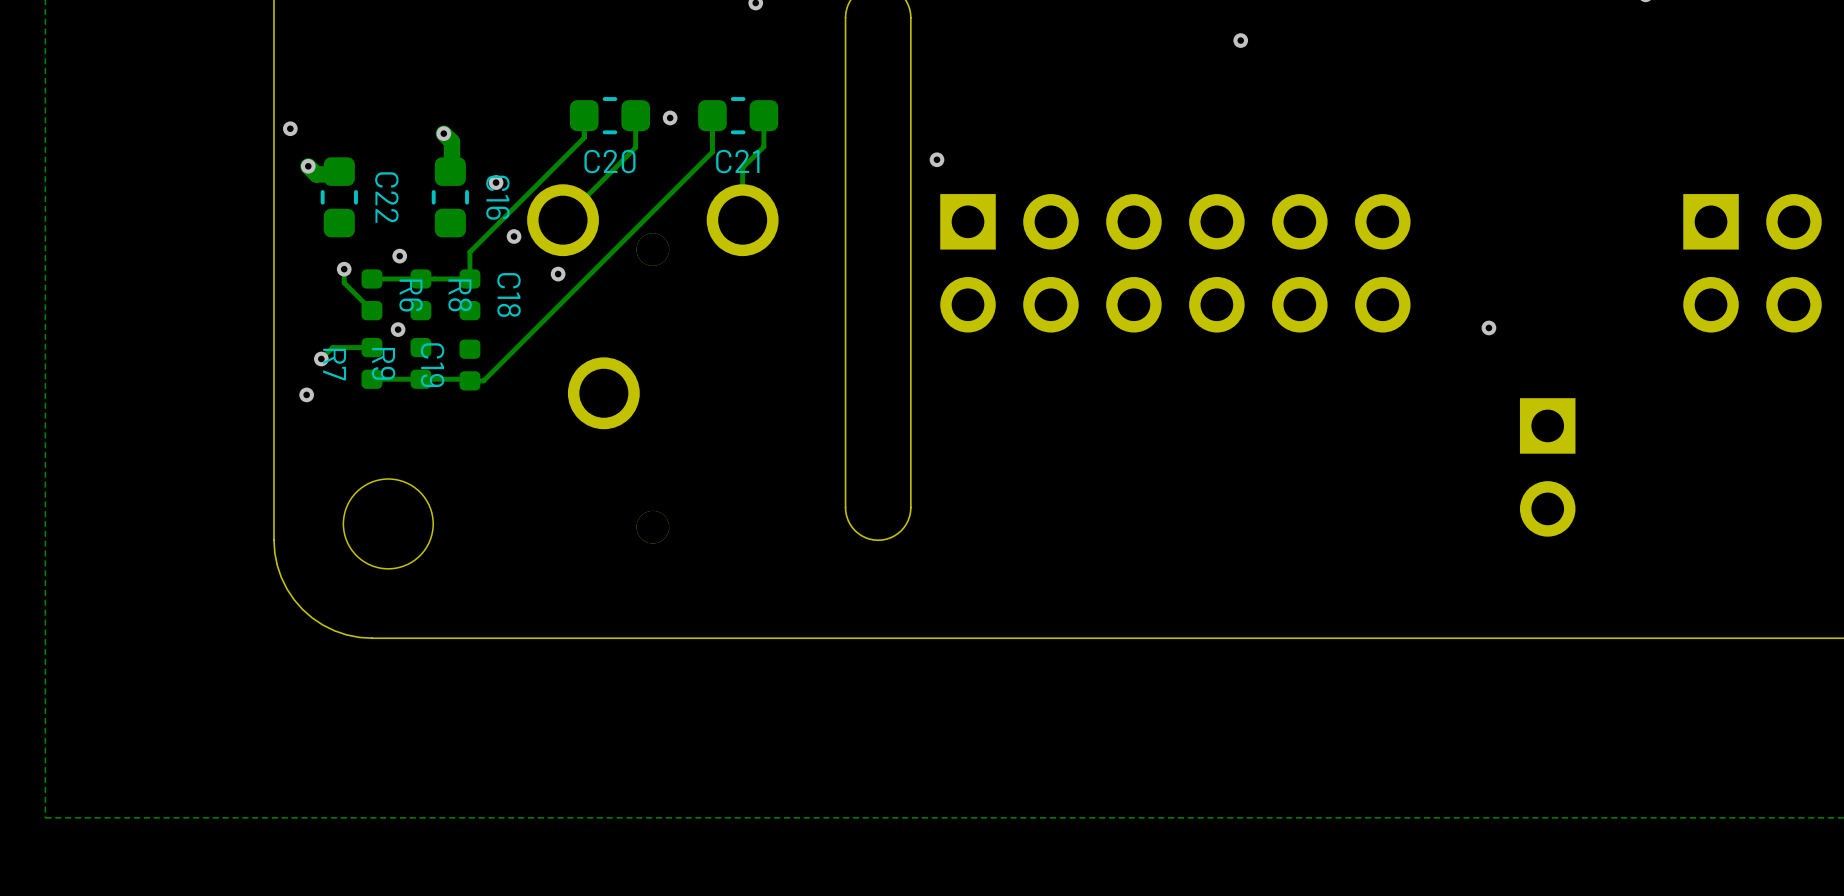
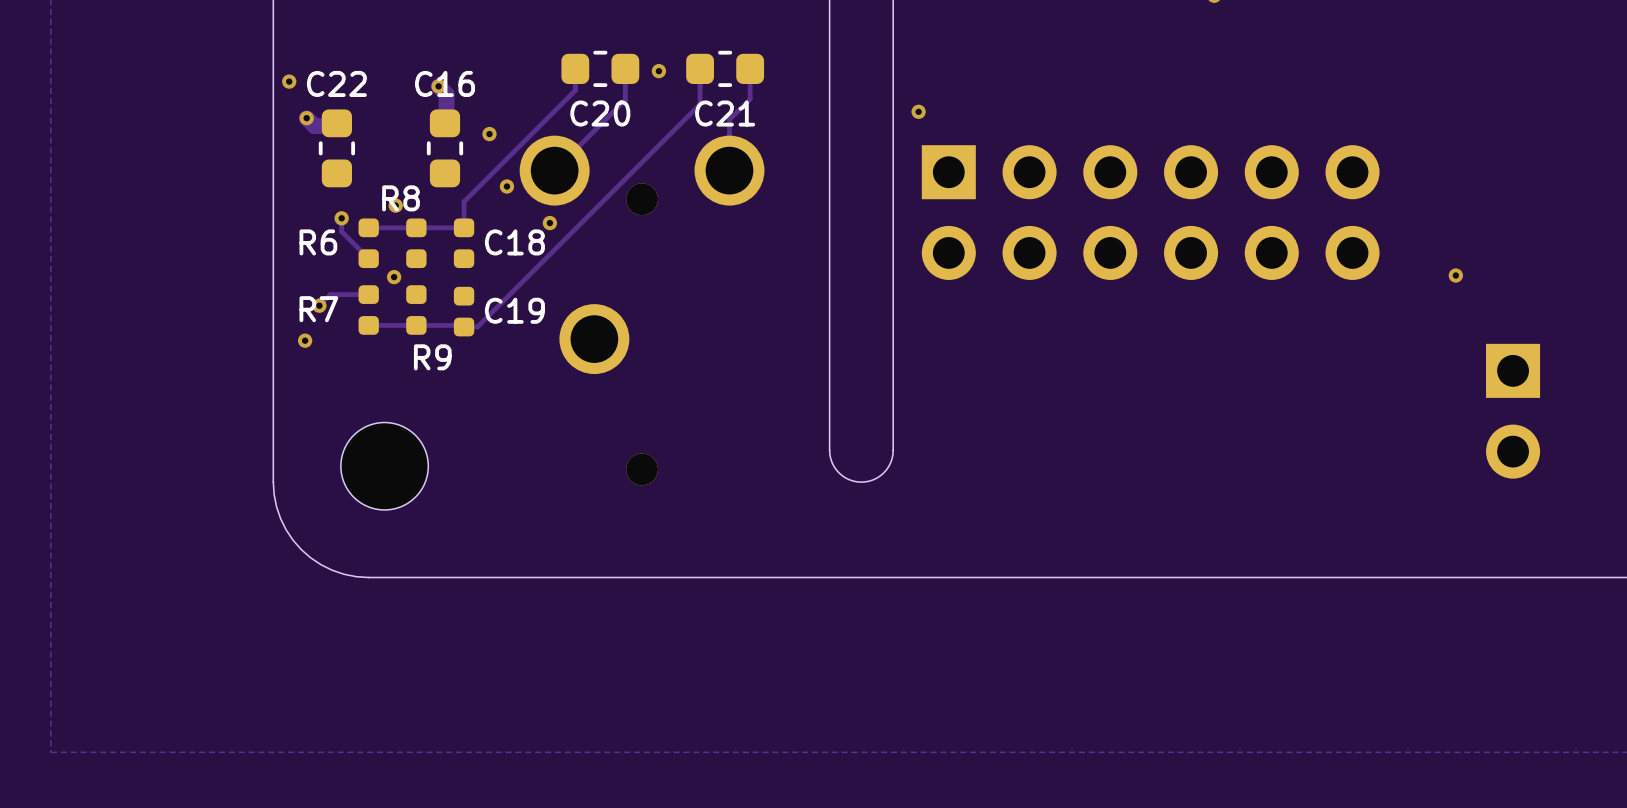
C22 name rotation: 0° (386, 197) -> 90° counterclockwise (336, 83)
C16 name rotation: 0° (497, 197) -> 90° counterclockwise (444, 83)
C18 name rotation: 0° (509, 294) -> 90° counterclockwise (514, 242)
R6 name rotation: 0° (411, 295) -> 90° counterclockwise (318, 242)
R6 name position: R6 (411, 295) -> R6 (318, 242)
R8 name rotation: 0° (460, 295) -> 90° counterclockwise (401, 198)
R8 name position: R8 (460, 295) -> R8 (401, 198)
R9 name rotation: 0° (383, 363) -> 90° counterclockwise (432, 357)
R9 name position: R9 (383, 363) -> R9 (432, 357)
R7 name rotation: 0° (334, 364) -> 90° counterclockwise (318, 309)
C19 name rotation: 0° (432, 365) -> 90° counterclockwise (514, 310)
C19 name position: C19 (432, 365) -> C19 (514, 310)

